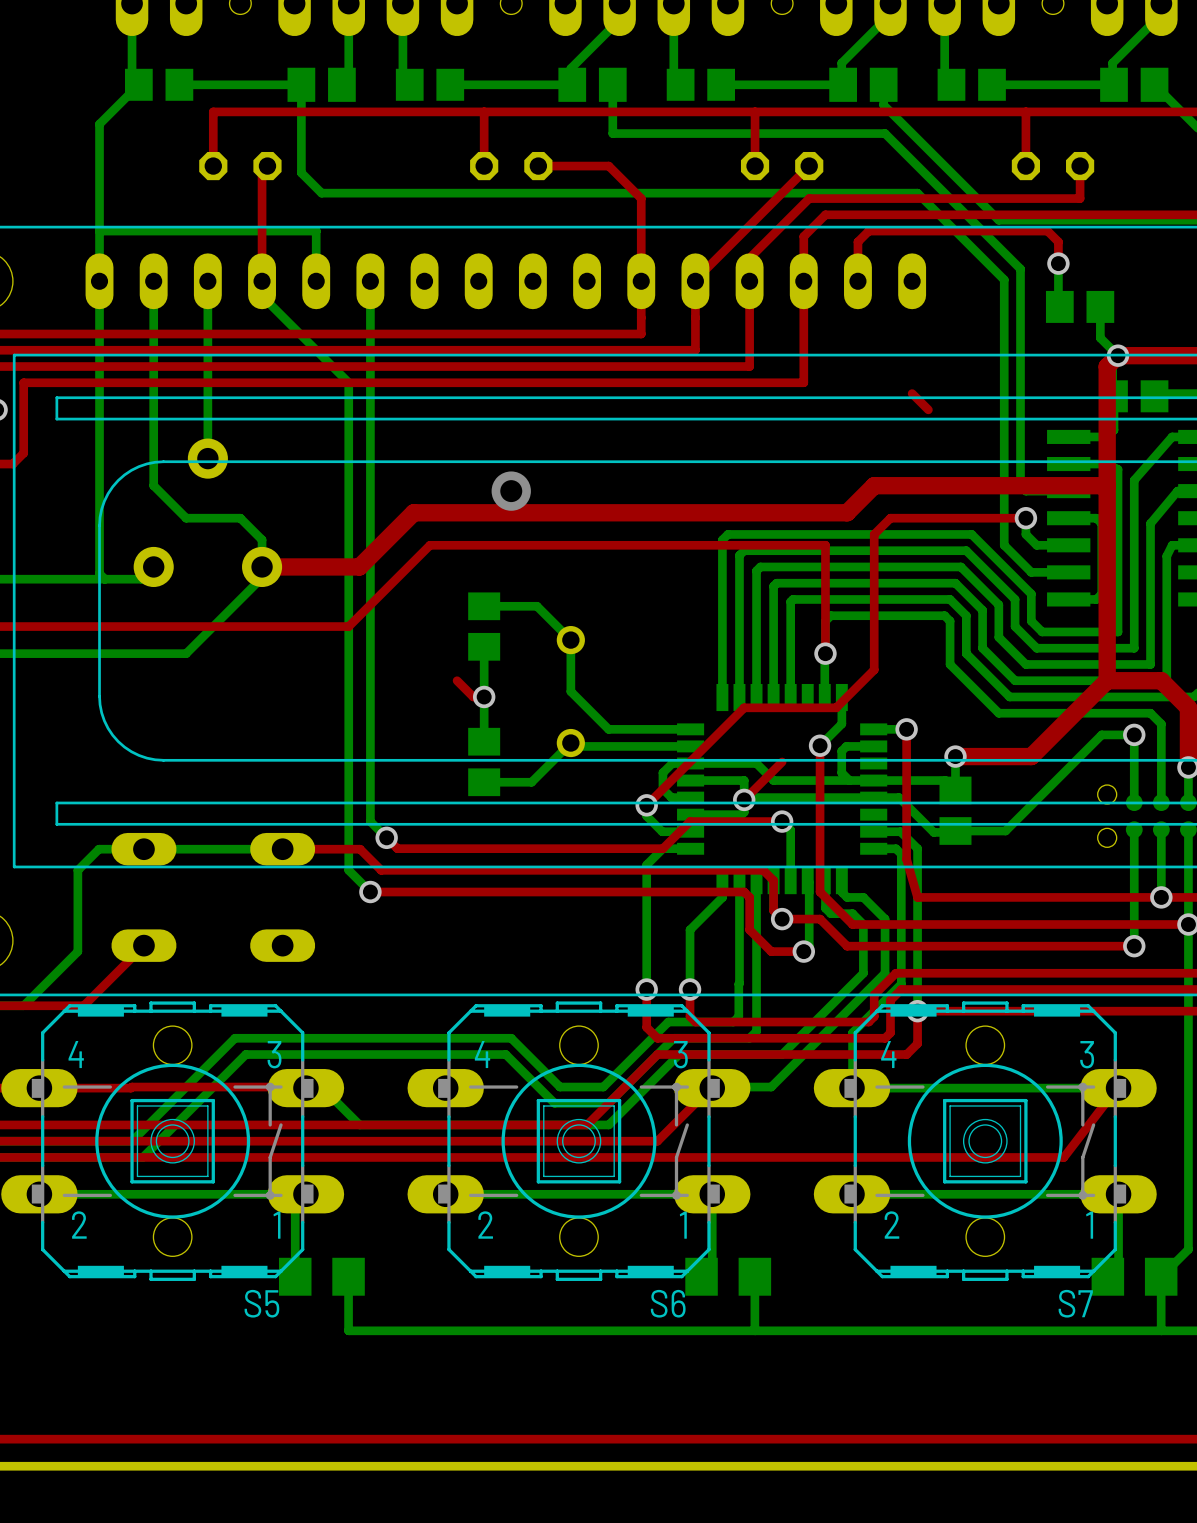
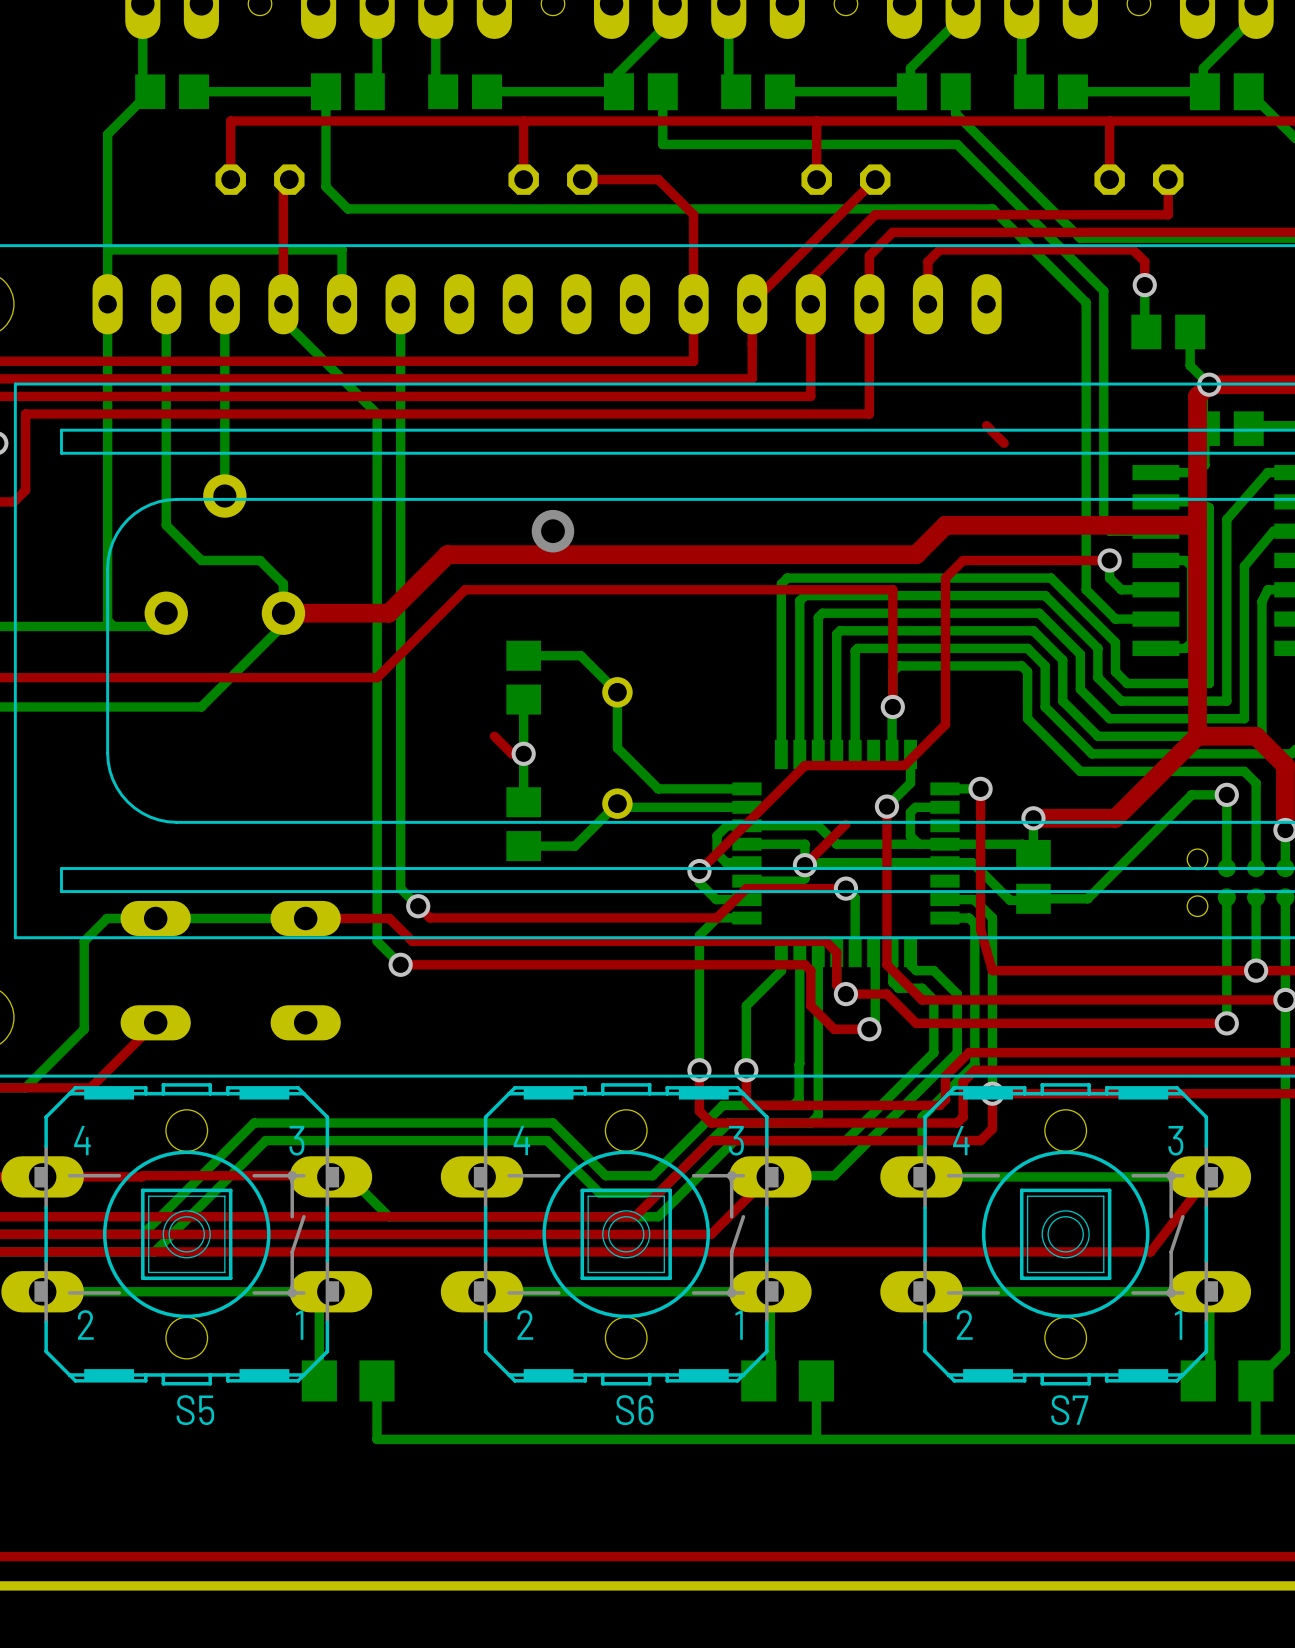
S5 name position: S5 (261, 1303) -> S5 (195, 1410)
S6 name position: S6 (668, 1303) -> S6 (634, 1410)
S7 name position: S7 (1075, 1303) -> S7 (1069, 1410)

